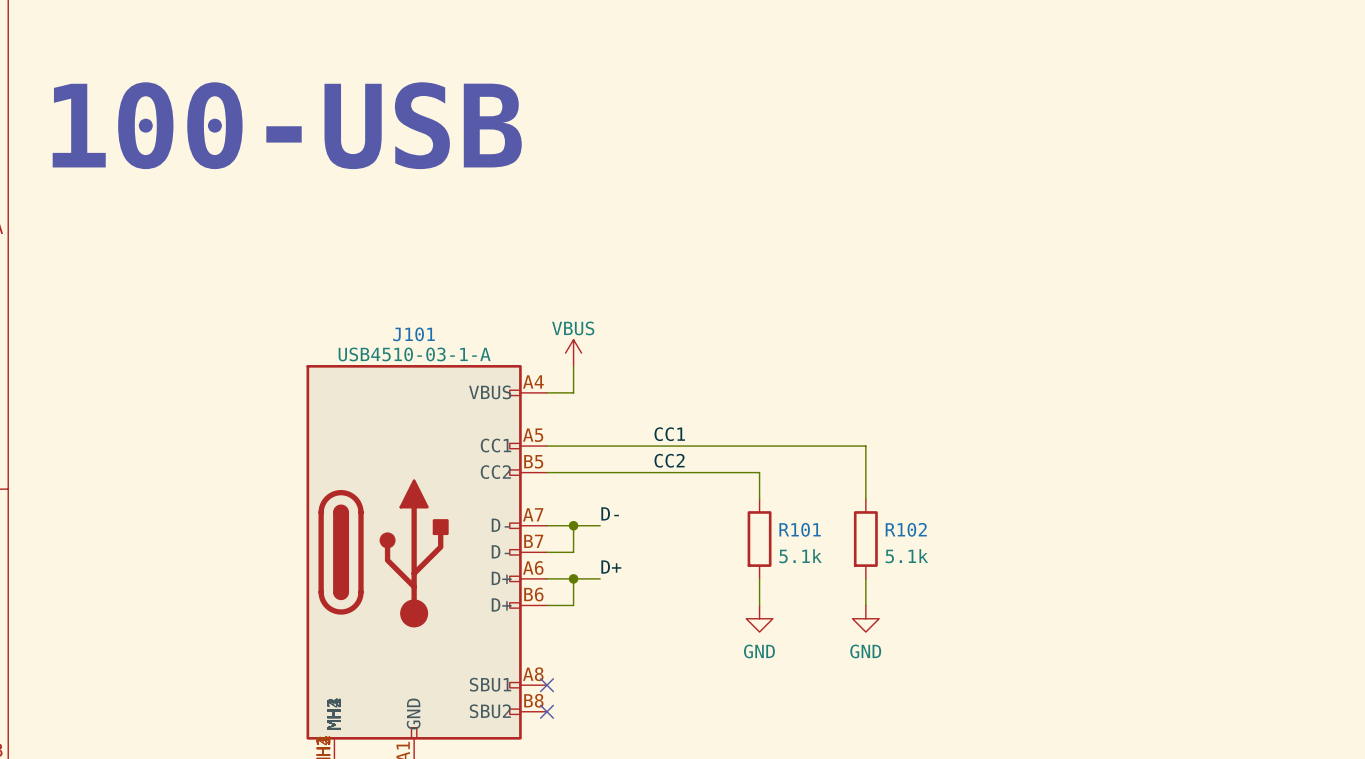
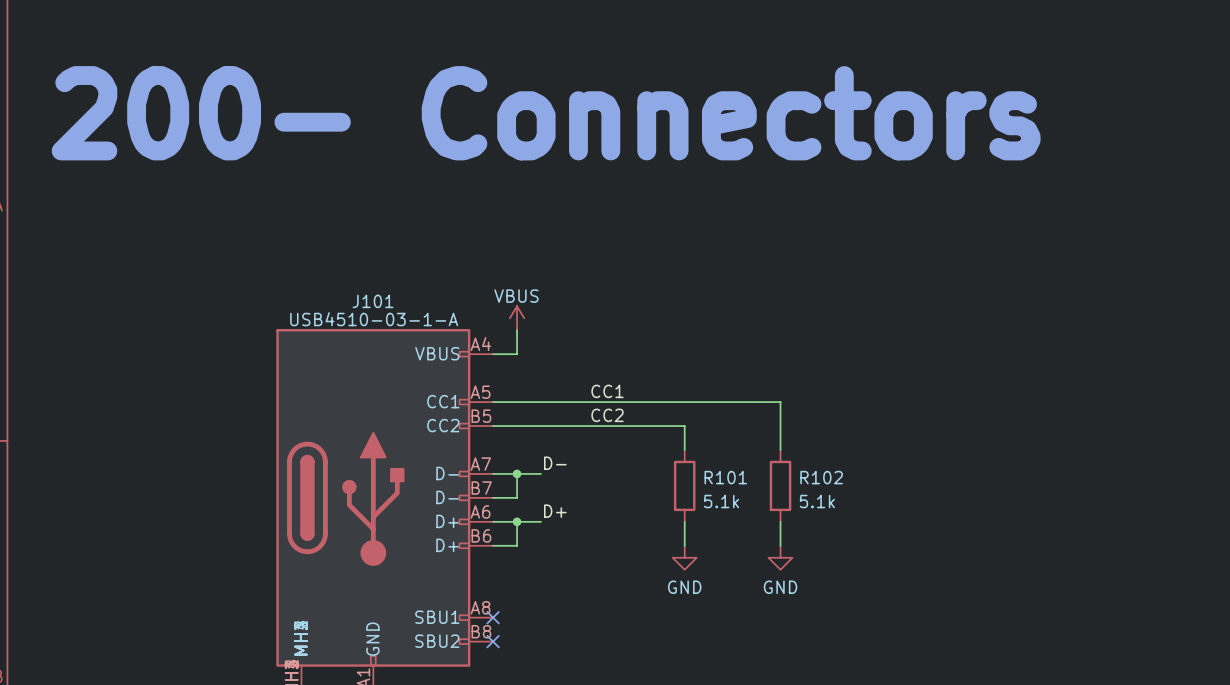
text: 100-USB (287, 125) -> 200- Connectors (546, 113)

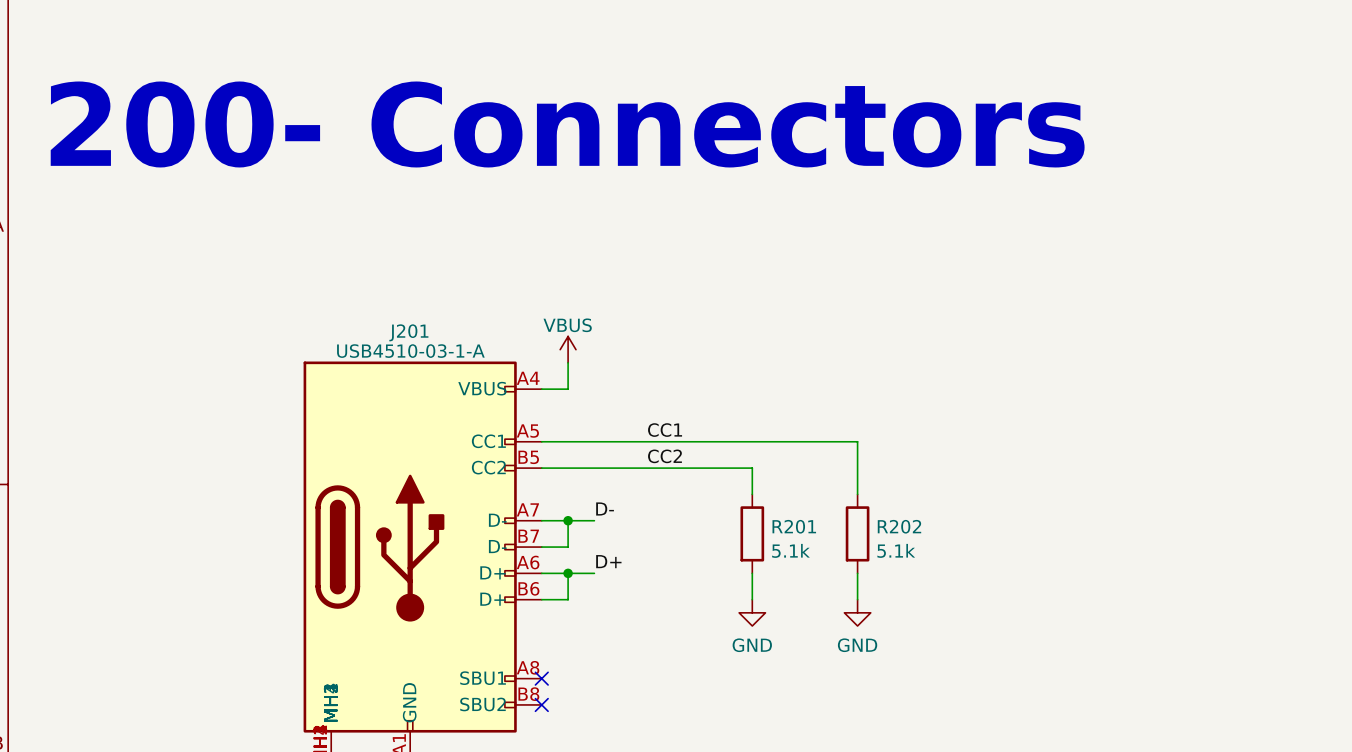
J101 name: J101 (373, 301) -> J201 (408, 332)
R101 name: R101 (725, 477) -> R201 (794, 526)
R102 name: R102 (821, 477) -> R202 (899, 526)

